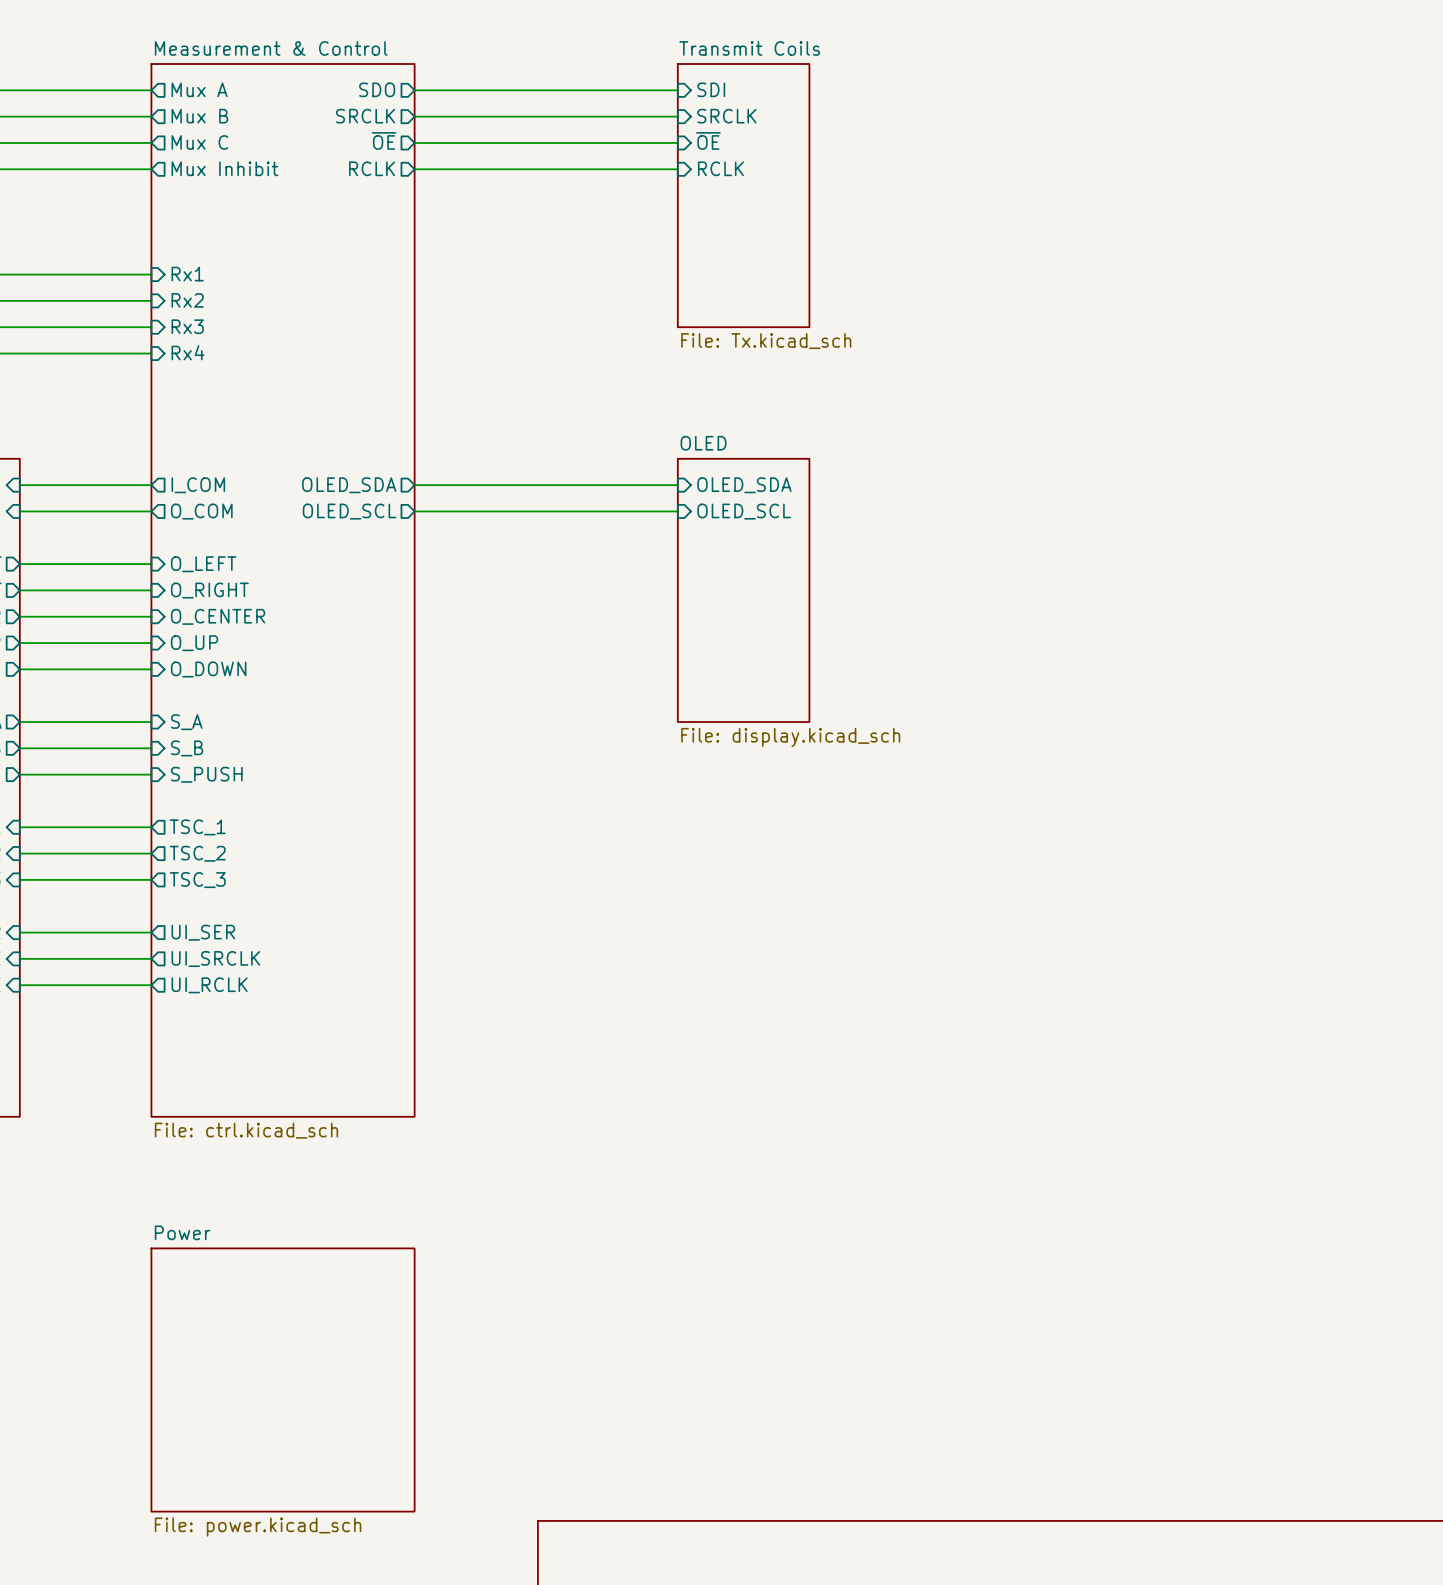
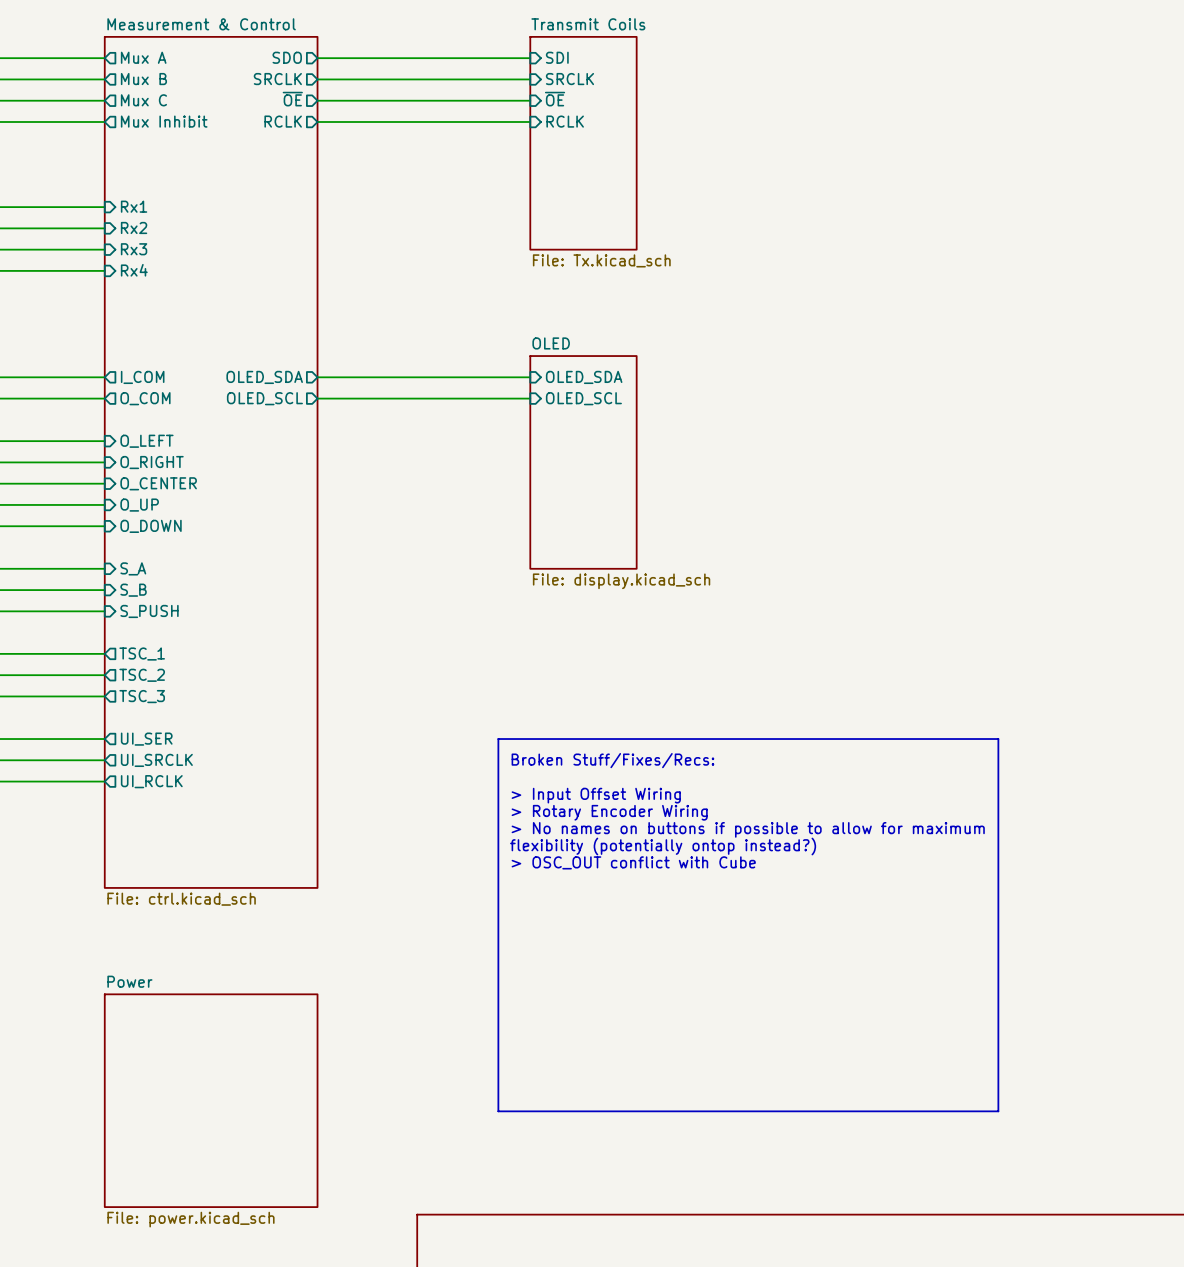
line: none -> (498, 739) (998, 739) (998, 1111) (498, 1111) (498, 739)
text: none -> Broken Stuff/Fixes/Recs: (612, 760)
text: none -> > Input Offset Wiring (596, 795)
text: none -> > Rotary Encoder Wiring (609, 812)
text: none -> > No names on buttons if possible to allow for maximum (748, 829)
text: none -> flexibility (potentially ontop instead?) (663, 846)
text: none -> > OSC_OUT conflict with Cube (633, 862)

